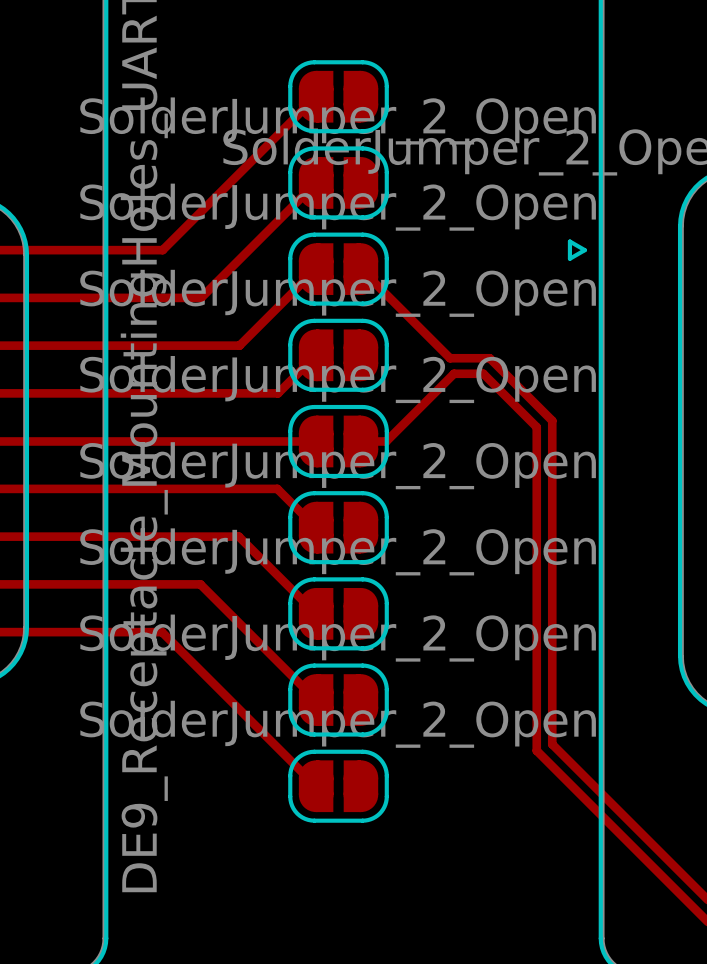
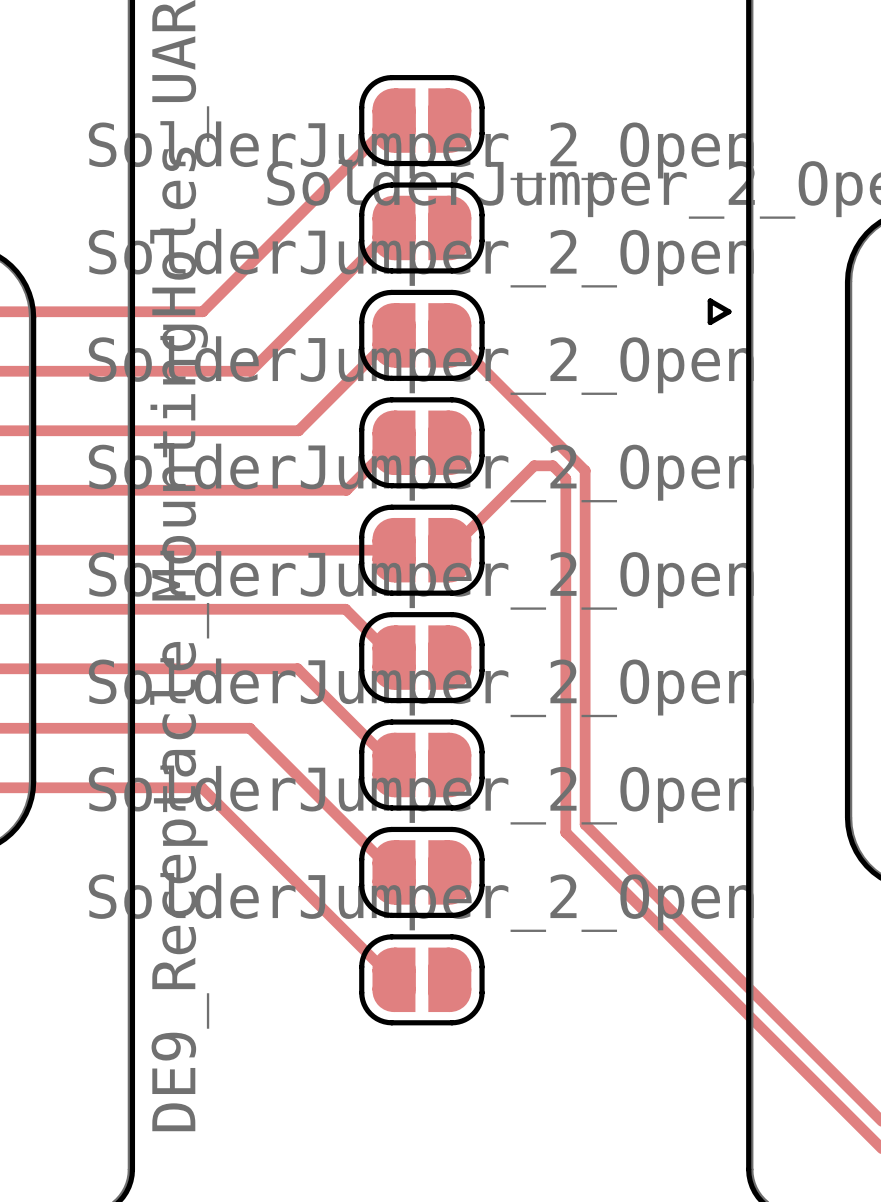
top track: (450, 358) (489, 358) (552, 420) (552, 744) -> (560, 446) (585, 470) (585, 824) (688, 927)
top track: (360, 441) (386, 441) (453, 373) (483, 373) (536, 427) (536, 750) -> (449, 550) (534, 465) (552, 465) (565, 478) (565, 832) (668, 935)

